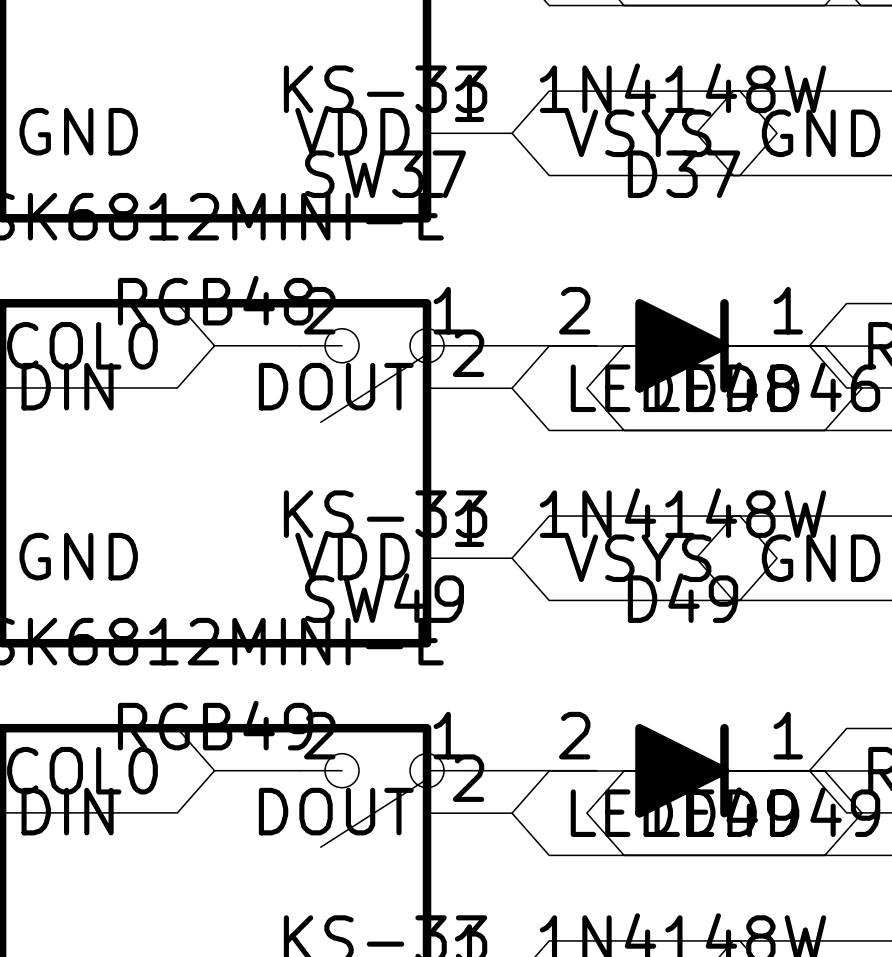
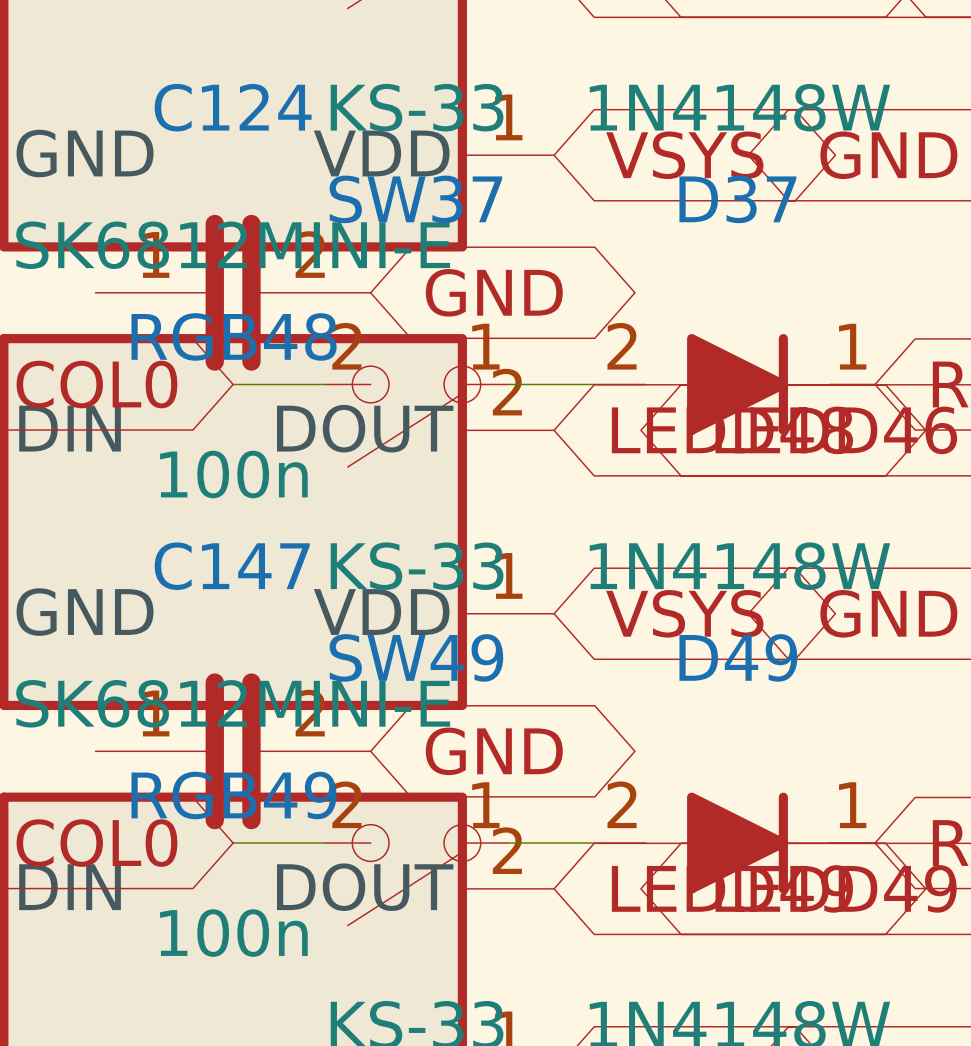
C124: none -> 100n (233, 292)
global label: none -> GND (494, 292)
C147: none -> 100n (233, 751)
global label: none -> GND (494, 751)

